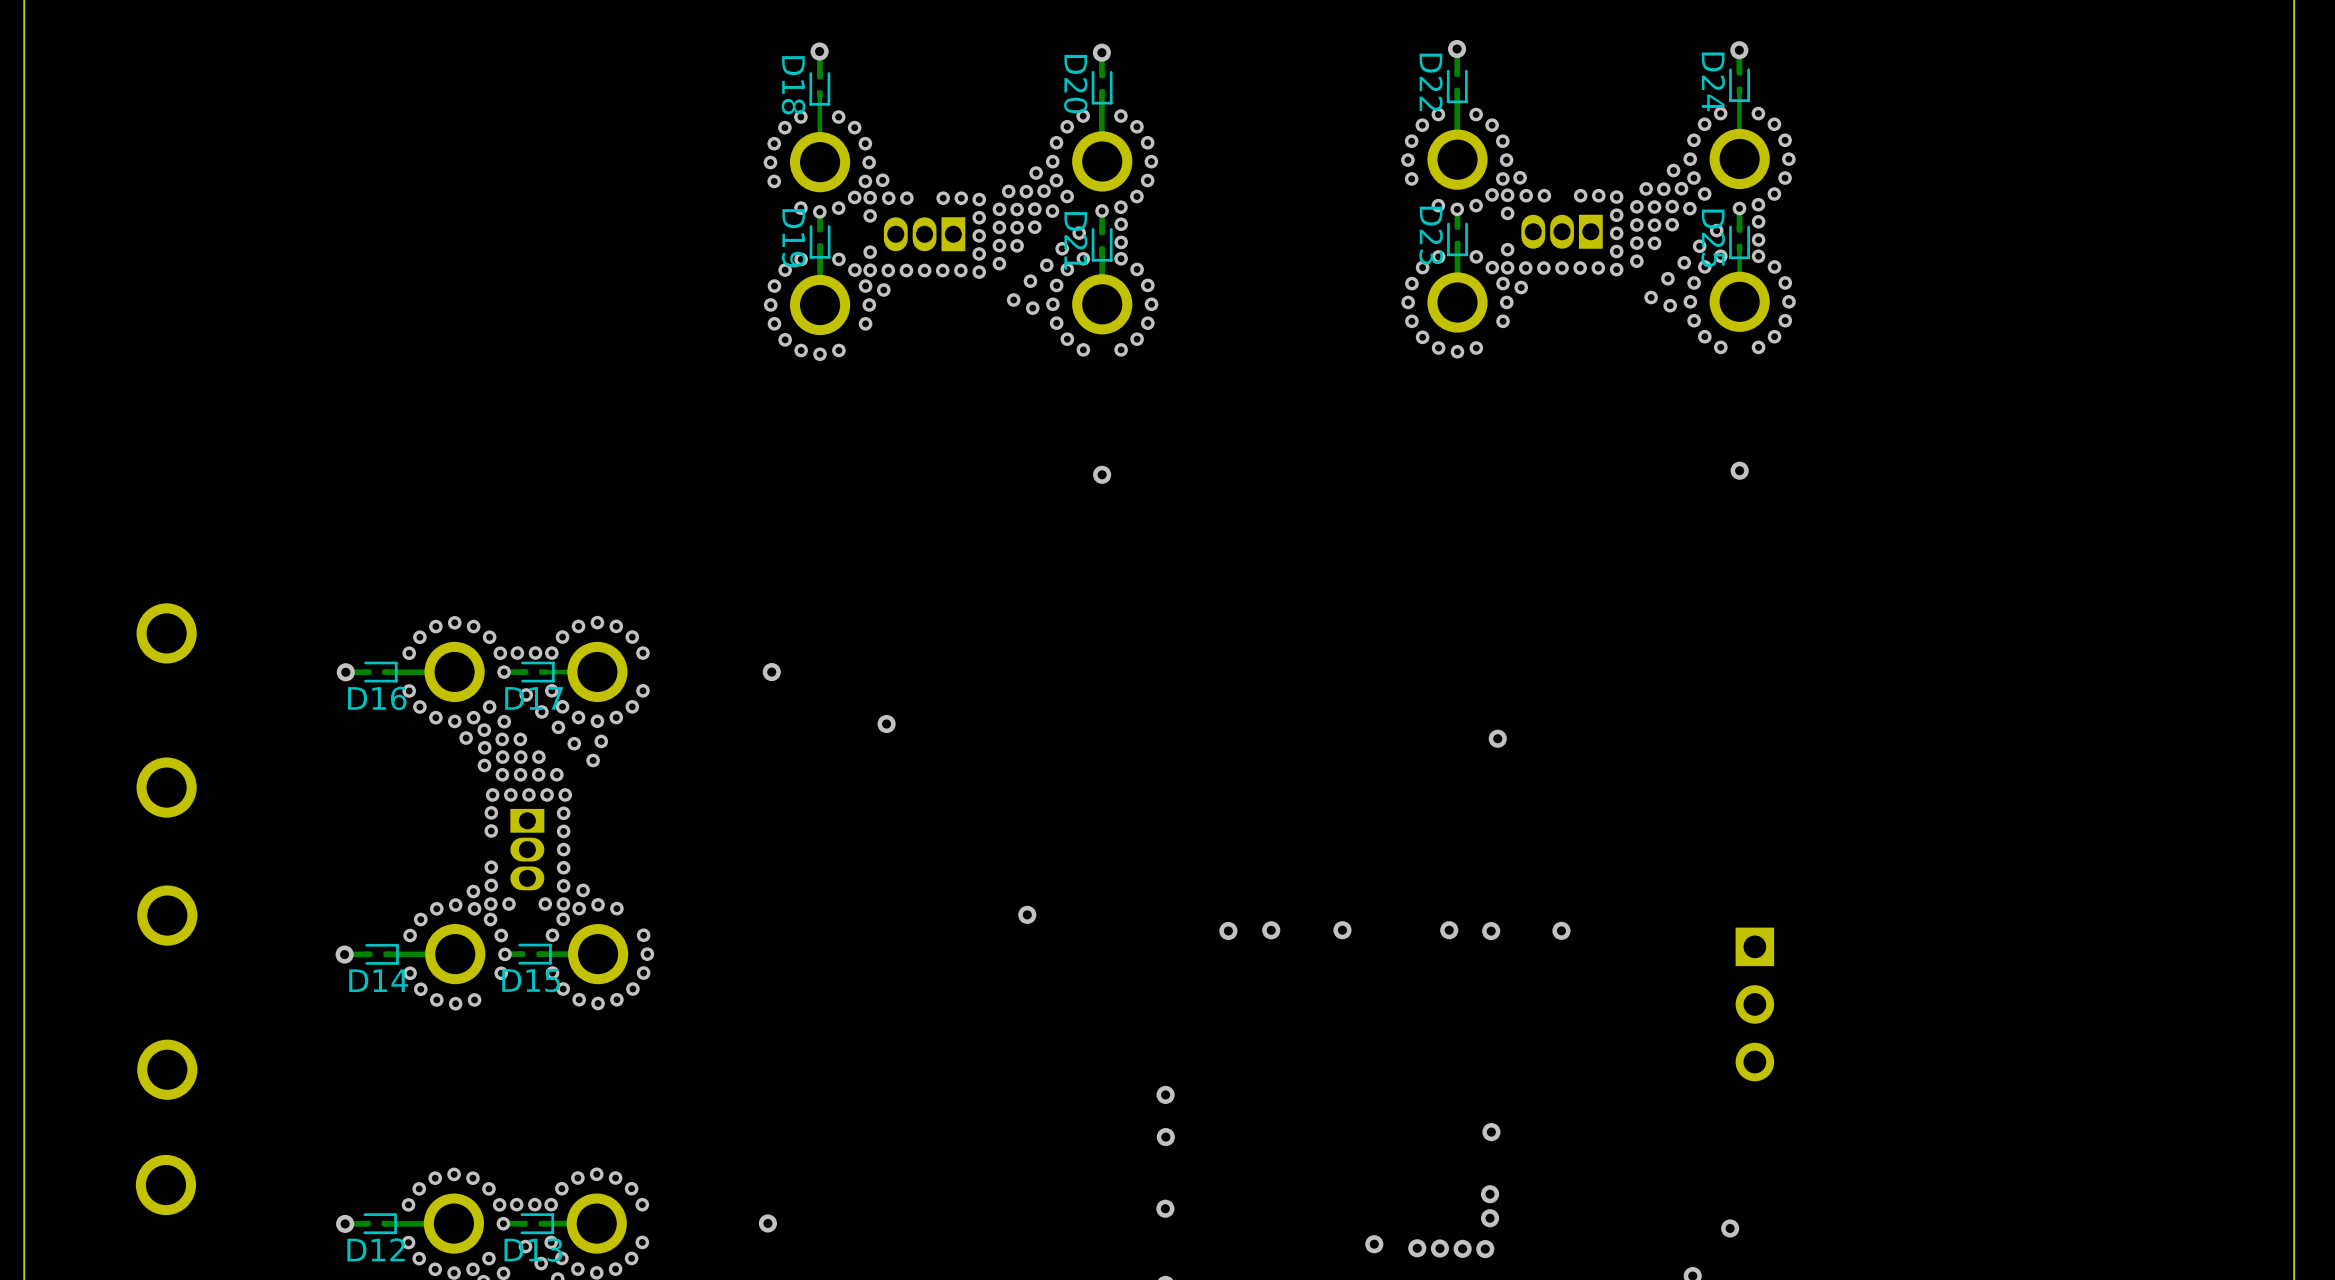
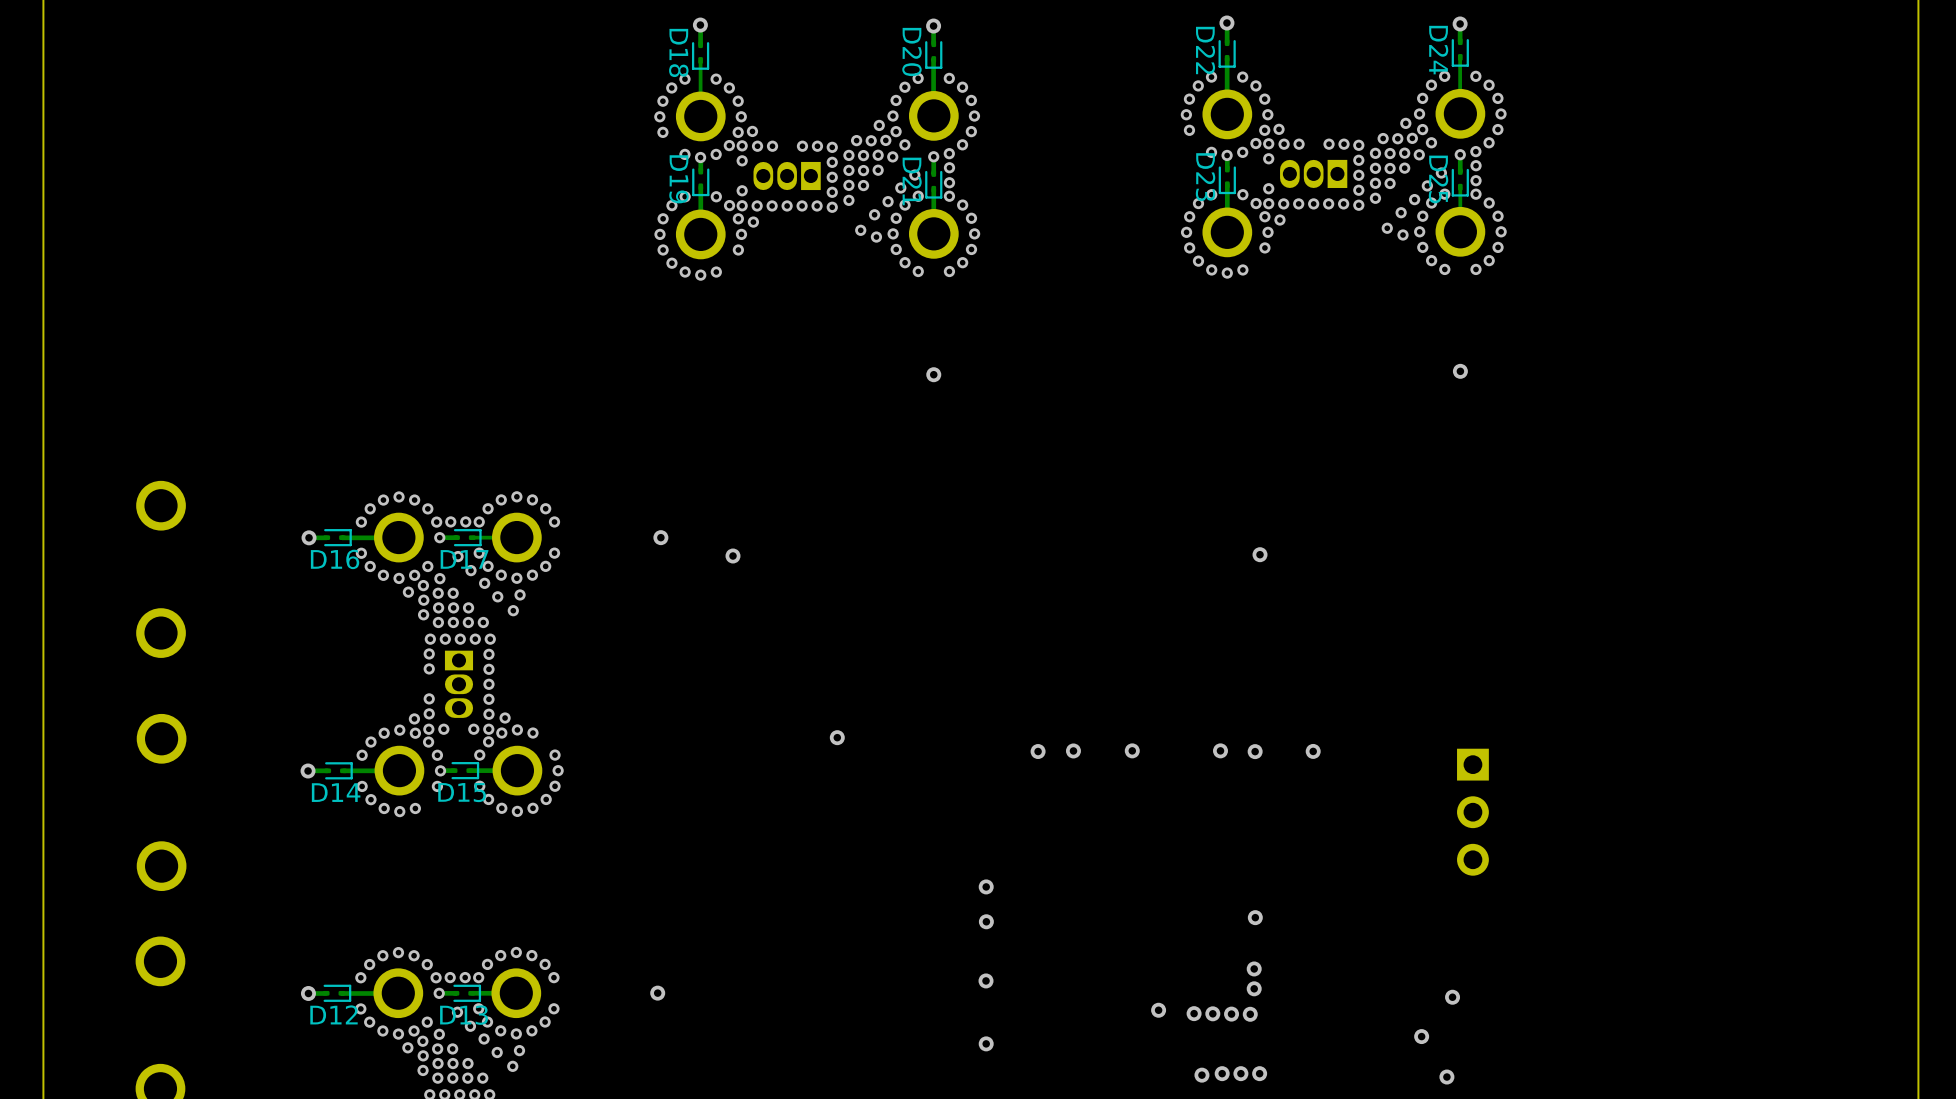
via position: (886, 724) -> (732, 556)
via position: (1497, 738) -> (1260, 554)
via position: (1027, 914) -> (837, 737)

